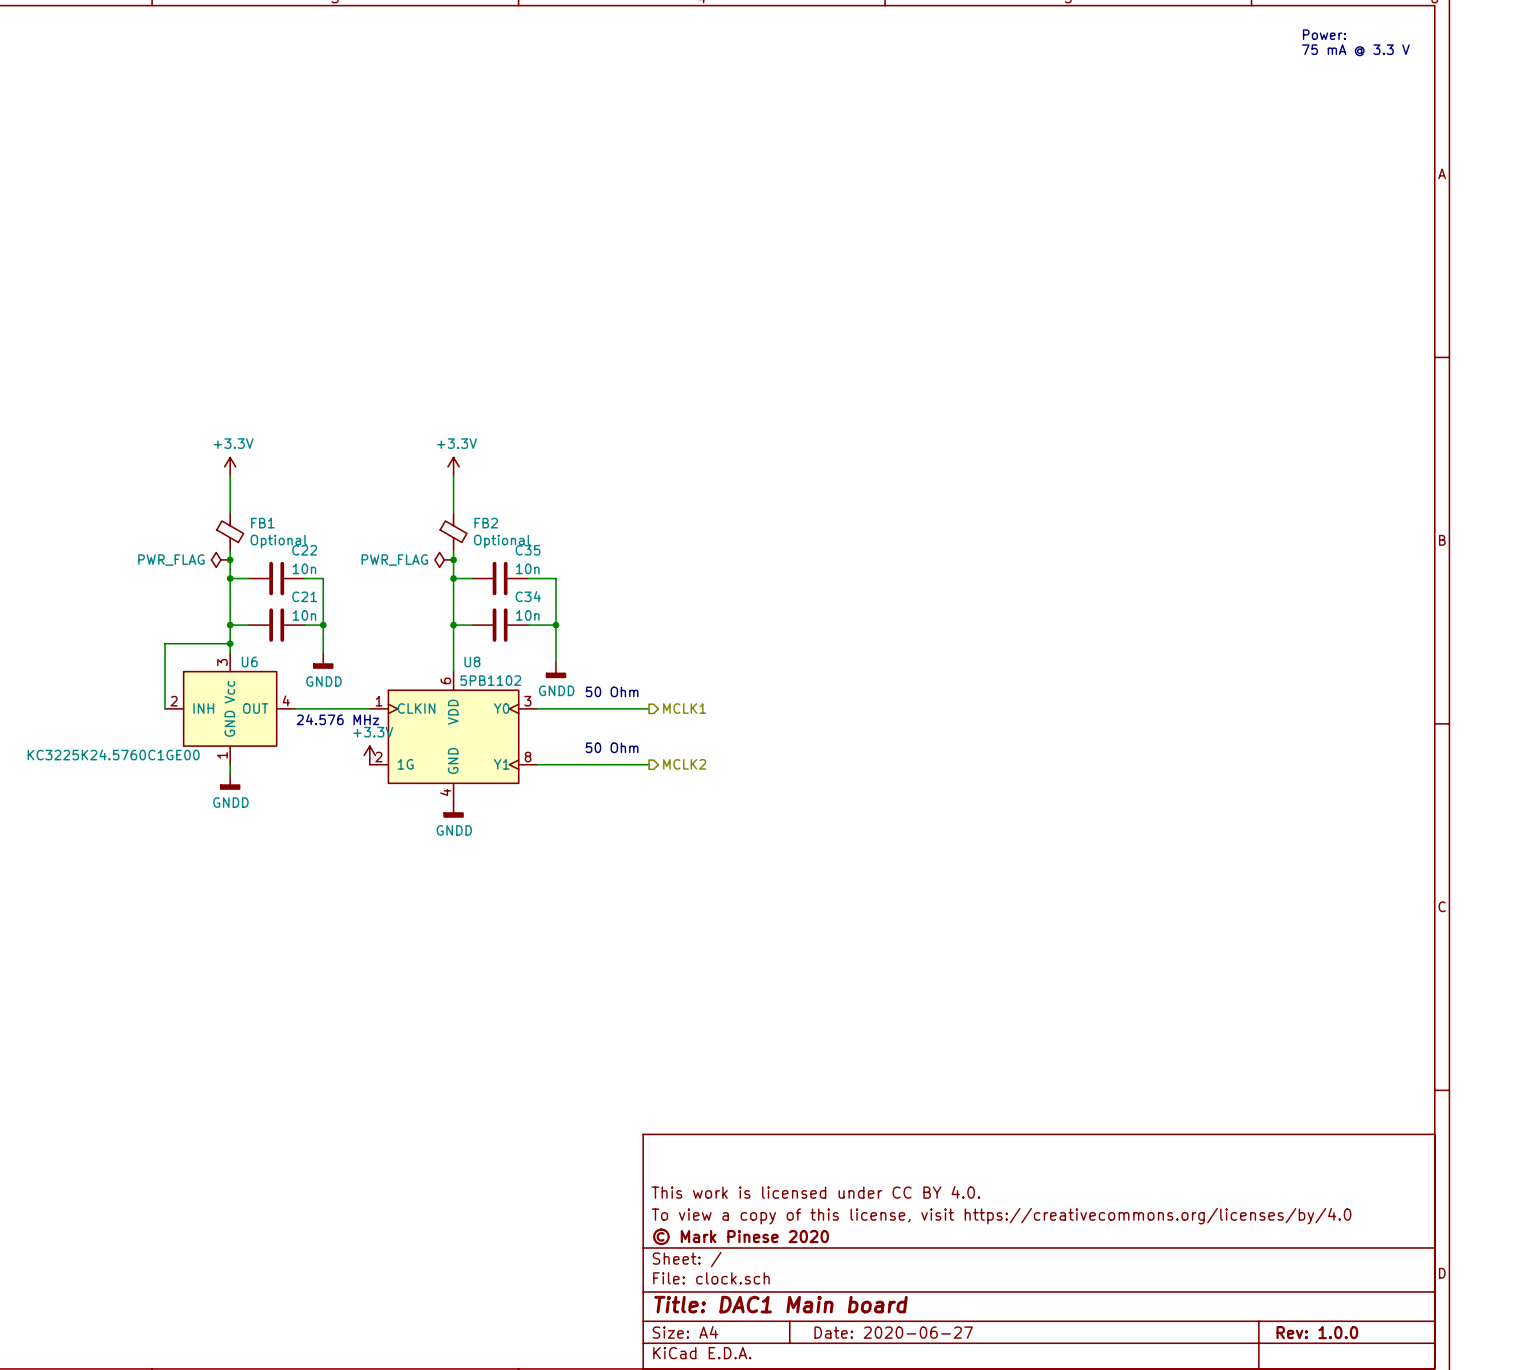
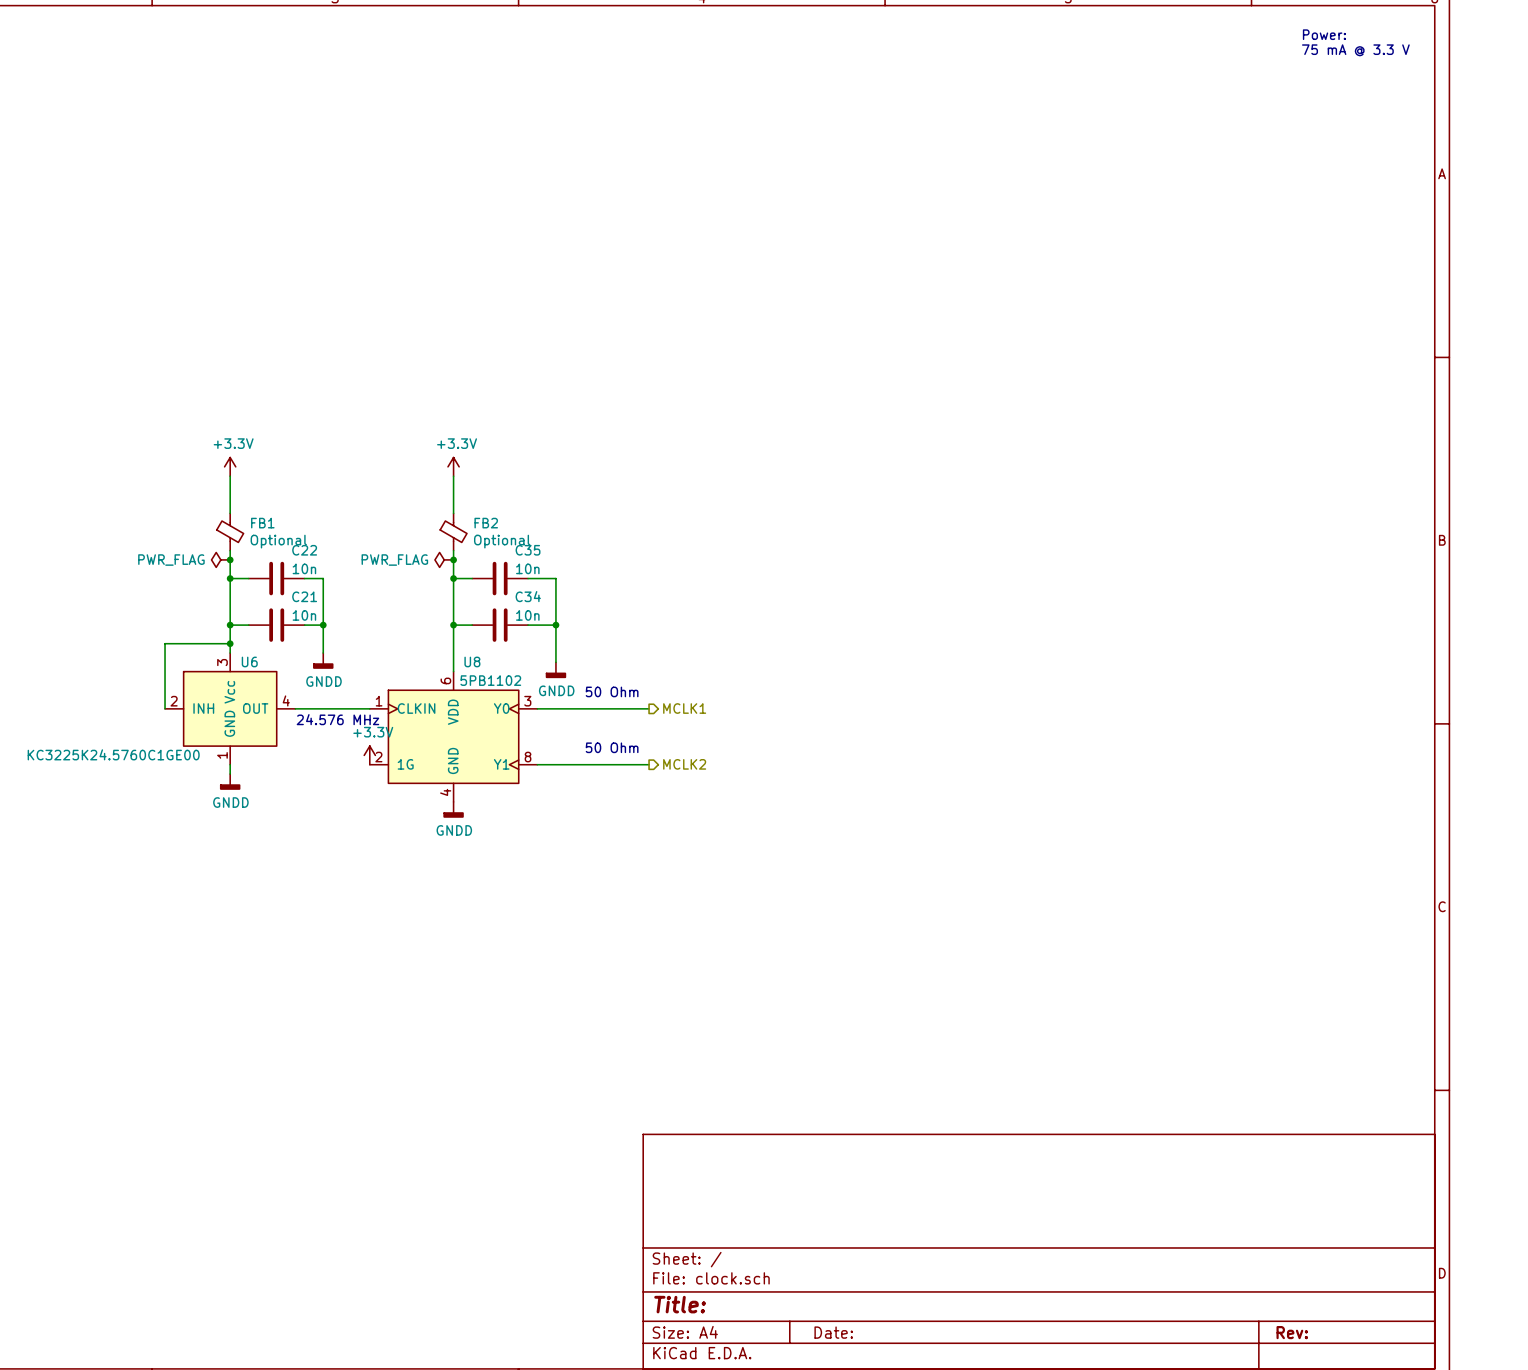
title block: This work is licensed under CC BY 4.0. (815, 1192) -> none
title block: To view a copy of this license, visit https://creativecommons.org/licenses/by/4.0 (1001, 1216) -> none
title block: © Mark Pinese 2020 (740, 1236) -> none
title block: Title: DAC1 Main board (780, 1304) -> Title: (680, 1304)
title block: Date: 2020-06-27 (893, 1332) -> Date: (833, 1332)
title block: Rev: 1.0.0 (1317, 1332) -> Rev: (1292, 1332)

